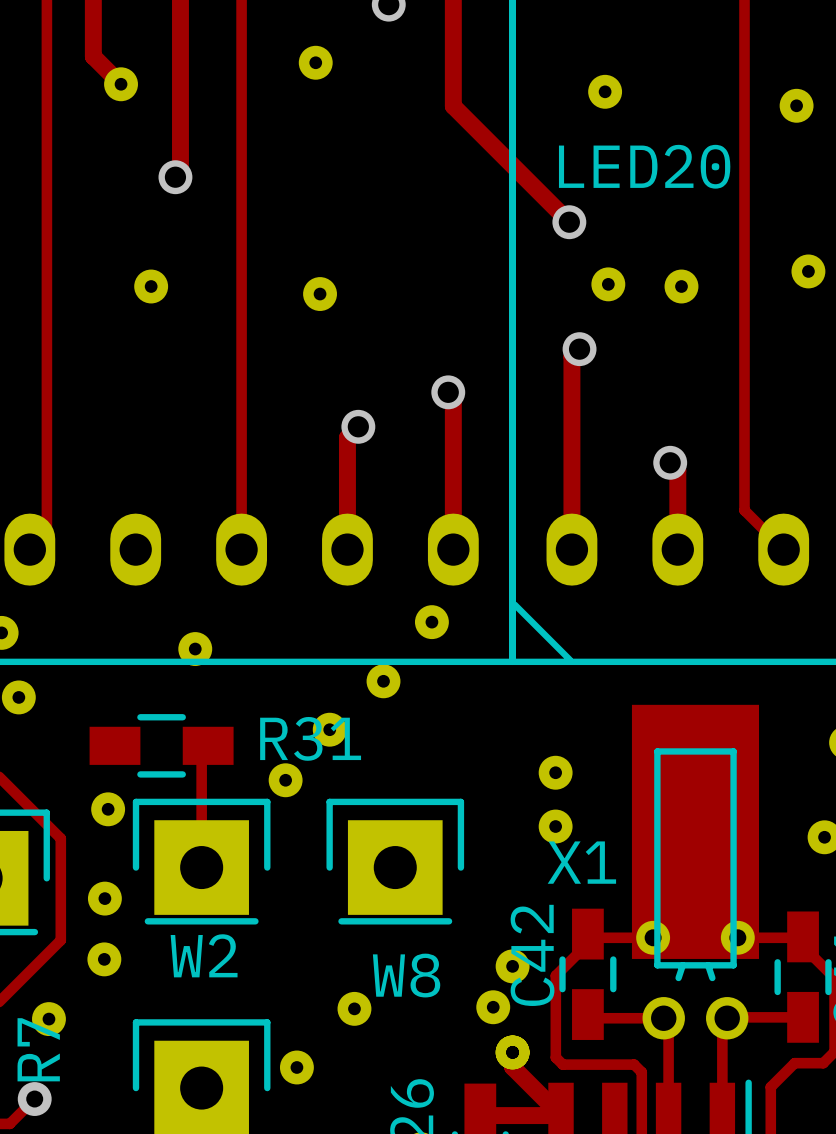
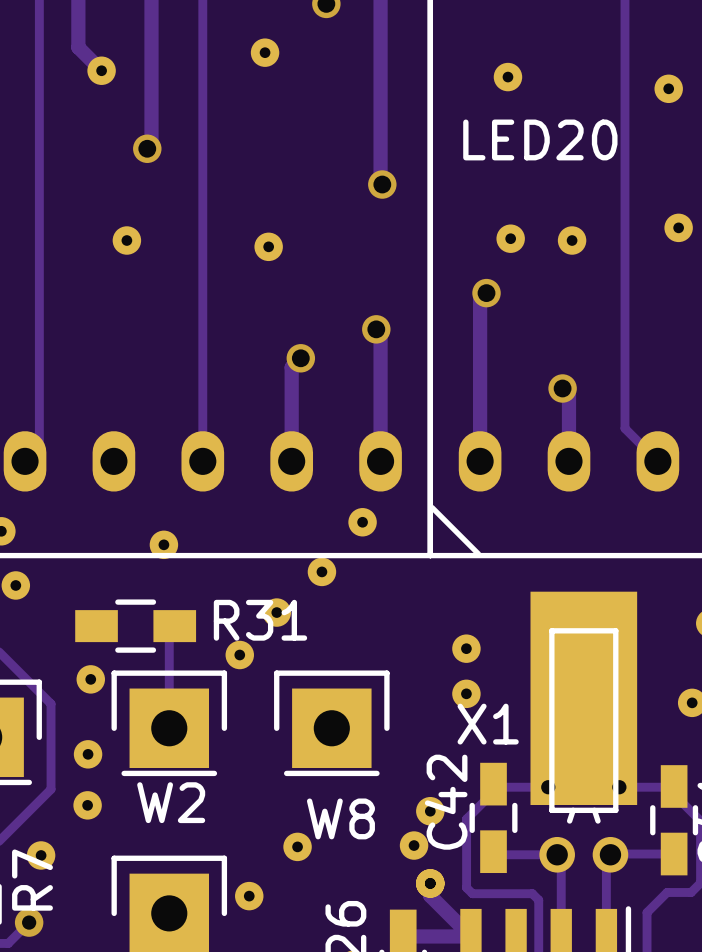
track: (453, 106) (569, 222) -> (380, 89) (380, 182) (382, 184)
via position: (569, 222) -> (382, 184)

